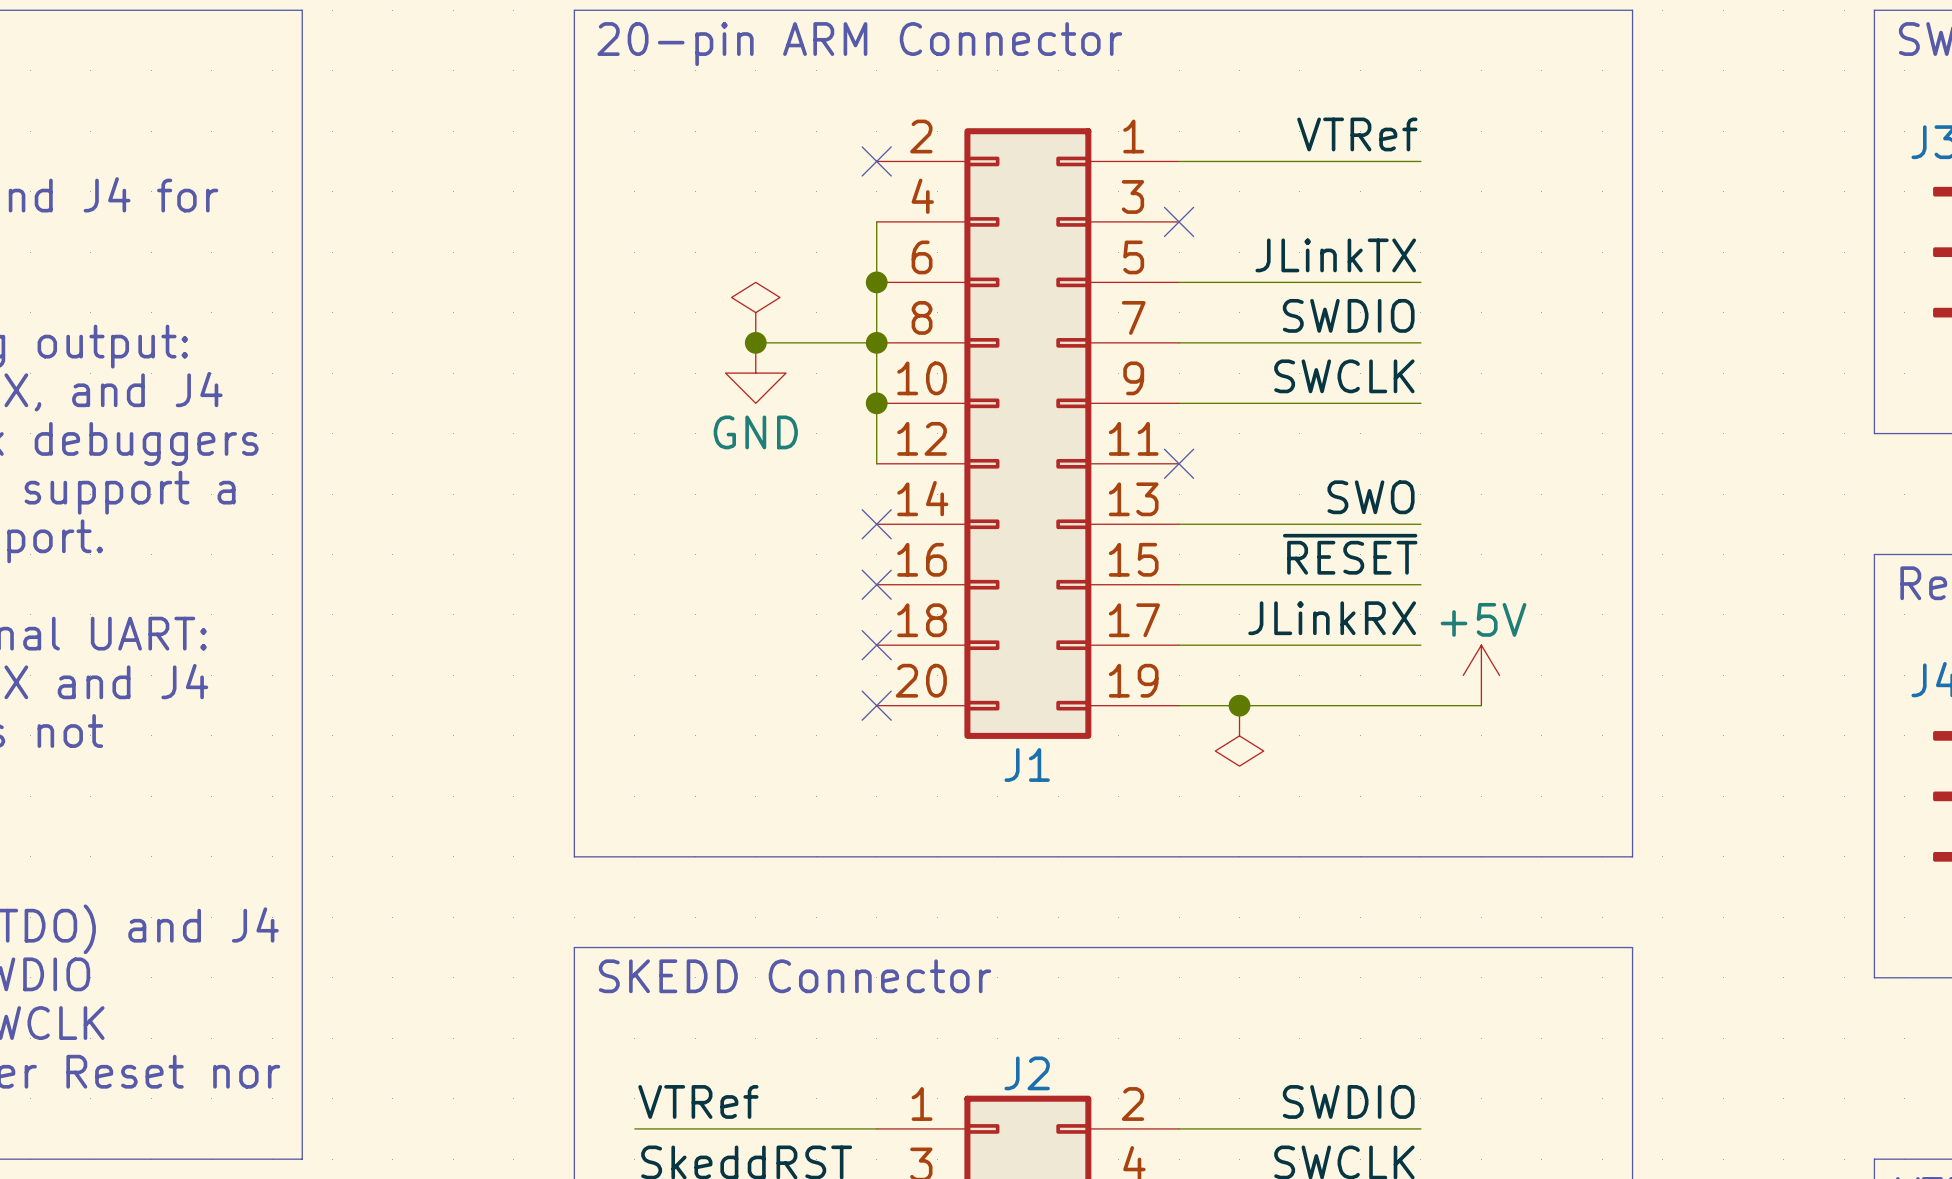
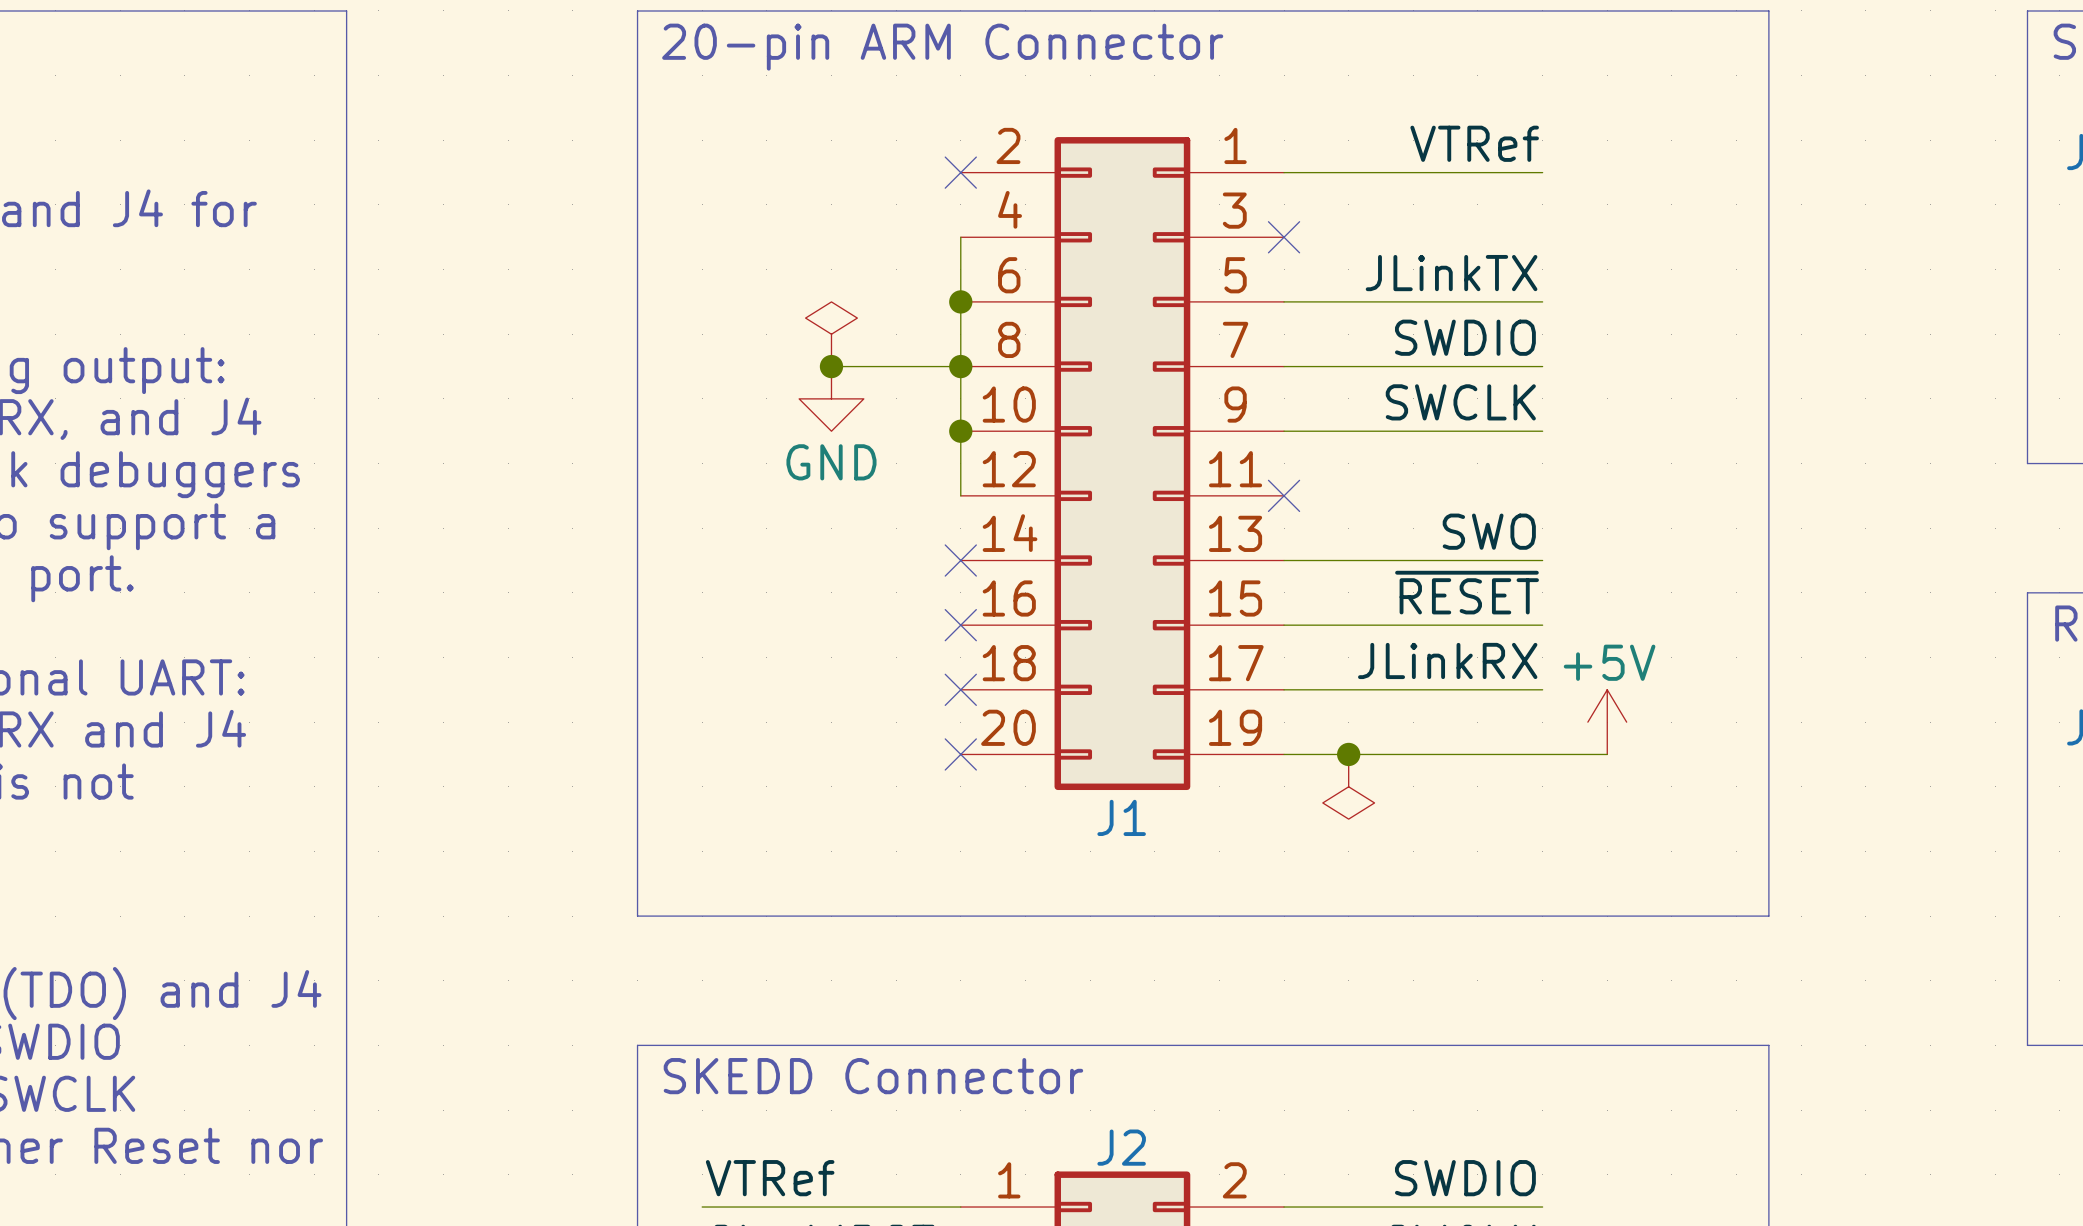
text position: SKEDD Connector (795, 976) -> SKEDD Connector (873, 1076)
line: (574, 977) (574, 947) (1632, 947) (1632, 977) -> (637, 1045) (1768, 1045)

